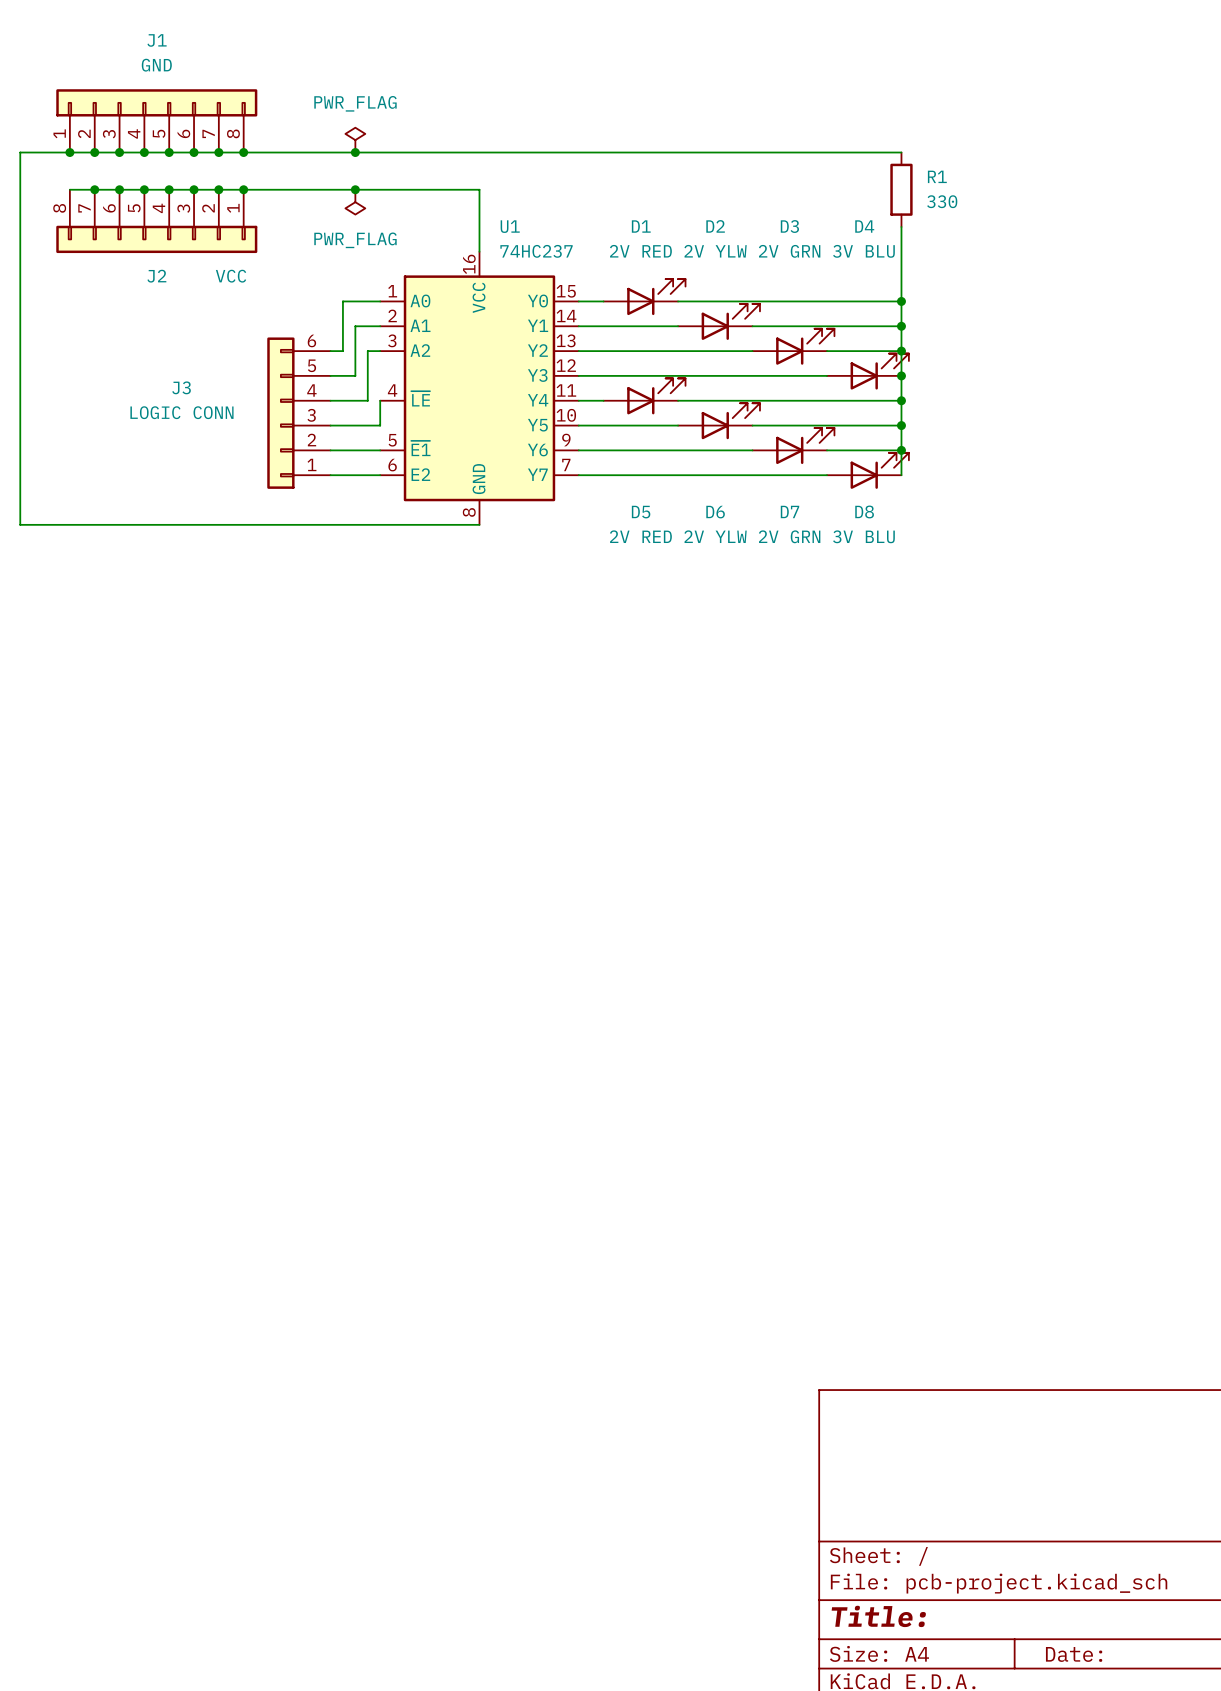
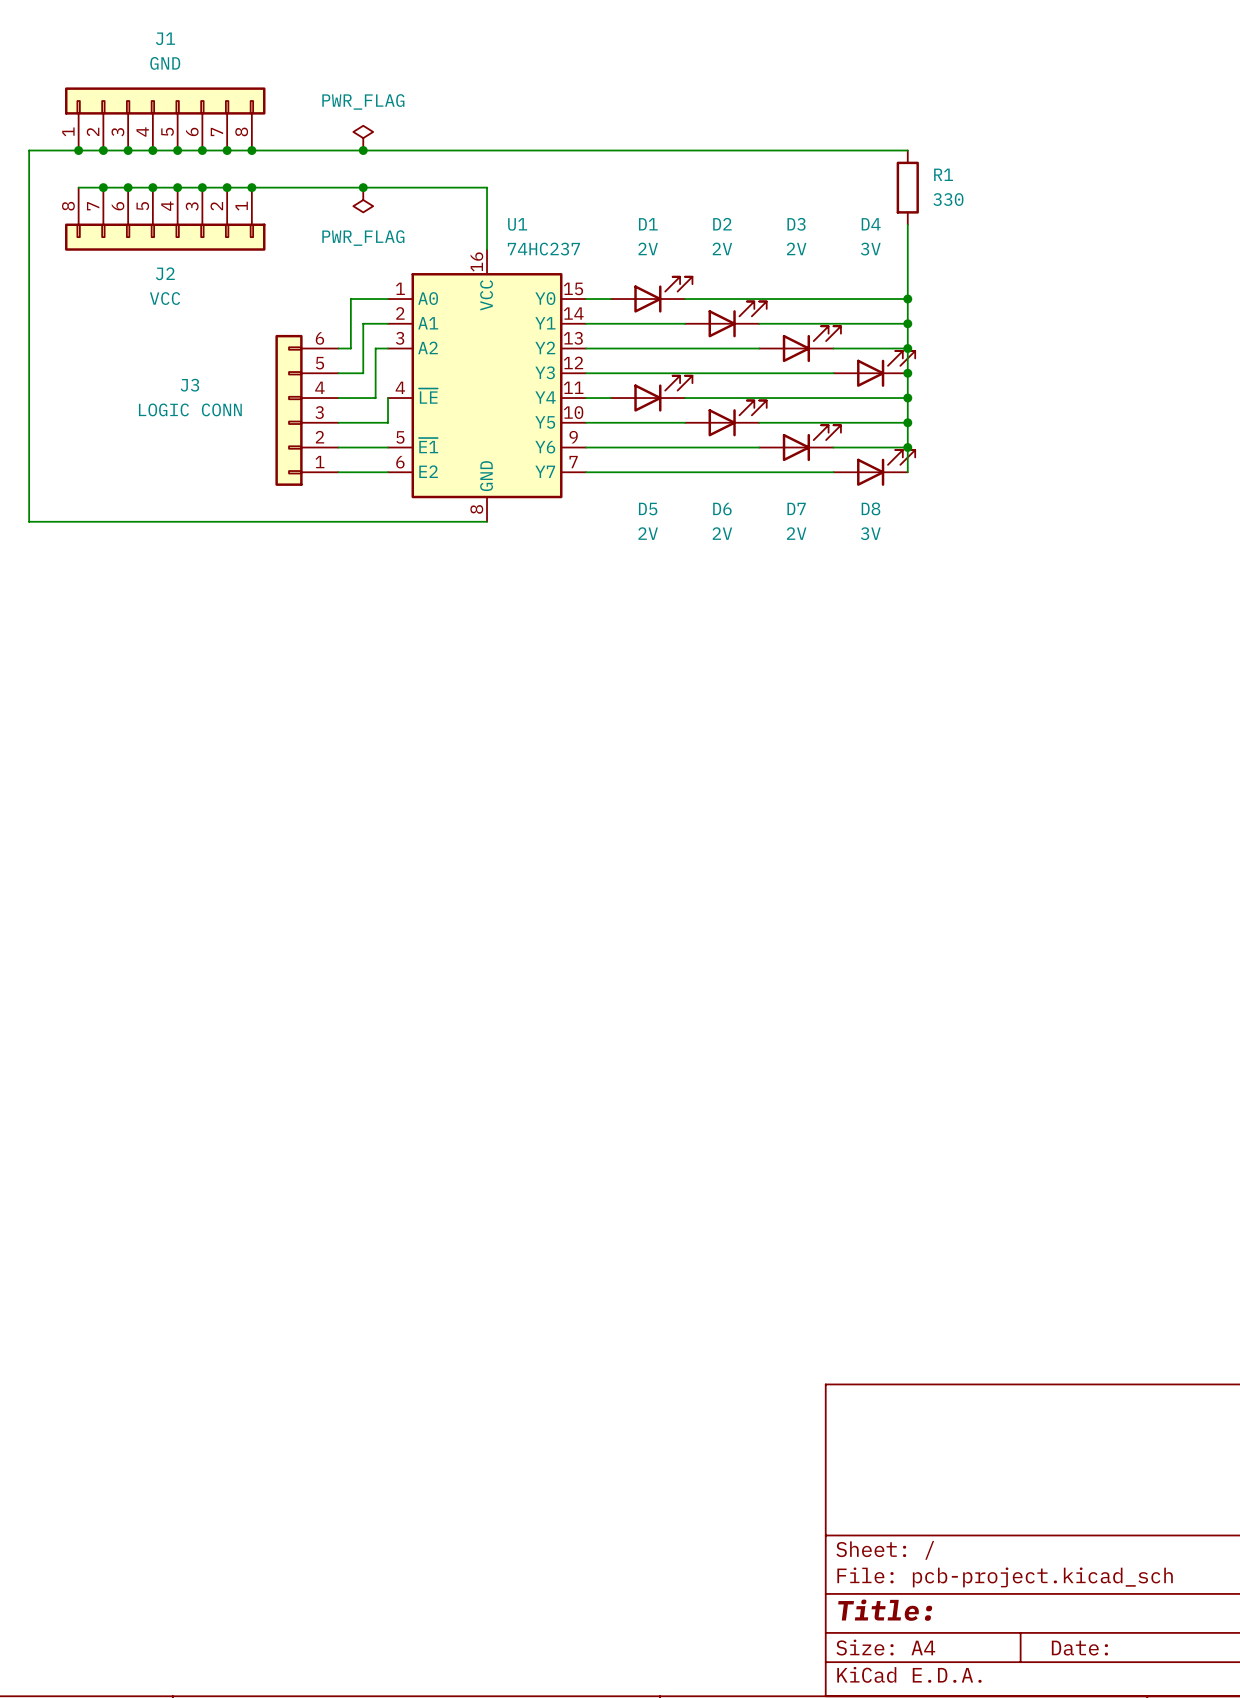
D1 value: 2V RED (640, 251) -> 2V (648, 248)
D2 value: 2V YLW (715, 251) -> 2V (722, 248)
D3 value: 2V GRN (789, 251) -> 2V (796, 248)
D4 value: 3V BLU (863, 251) -> 3V (870, 249)
J2 value position: VCC (231, 276) -> VCC (165, 298)
D5 value: 2V RED (640, 536) -> 2V (648, 533)
D6 value: 2V YLW (715, 536) -> 2V (722, 533)
D7 value: 2V GRN (789, 536) -> 2V (796, 533)
D8 value: 3V BLU (863, 536) -> 3V (870, 533)

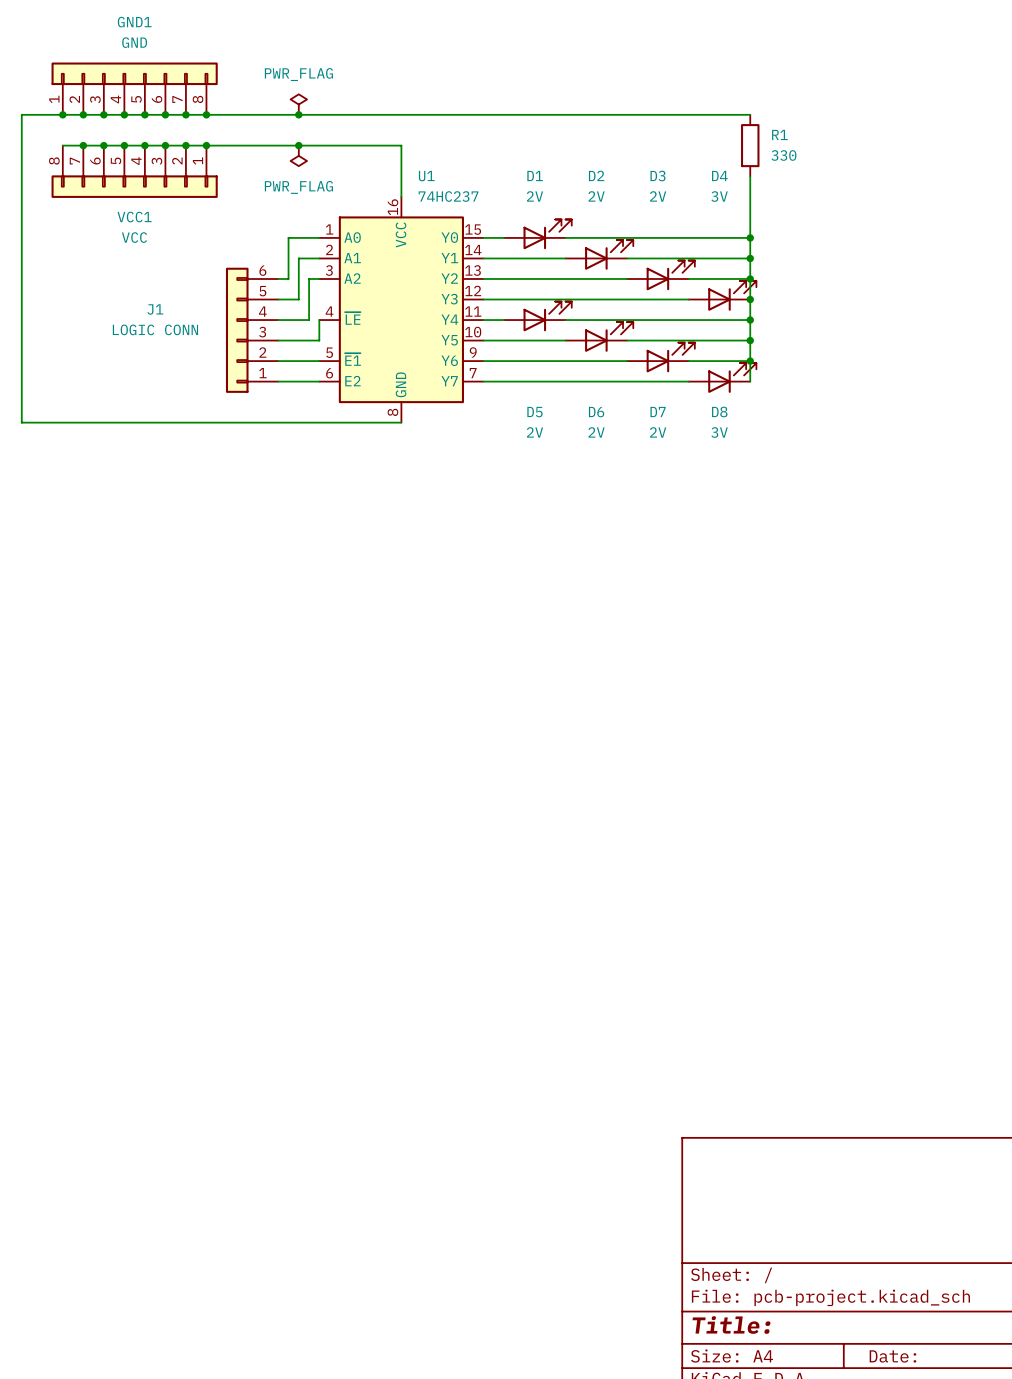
J1 name: J1 (165, 38) -> GND1 (134, 22)
J2 name: J2 (165, 273) -> VCC1 (134, 217)
J3 name: J3 (189, 385) -> J1 (155, 309)

